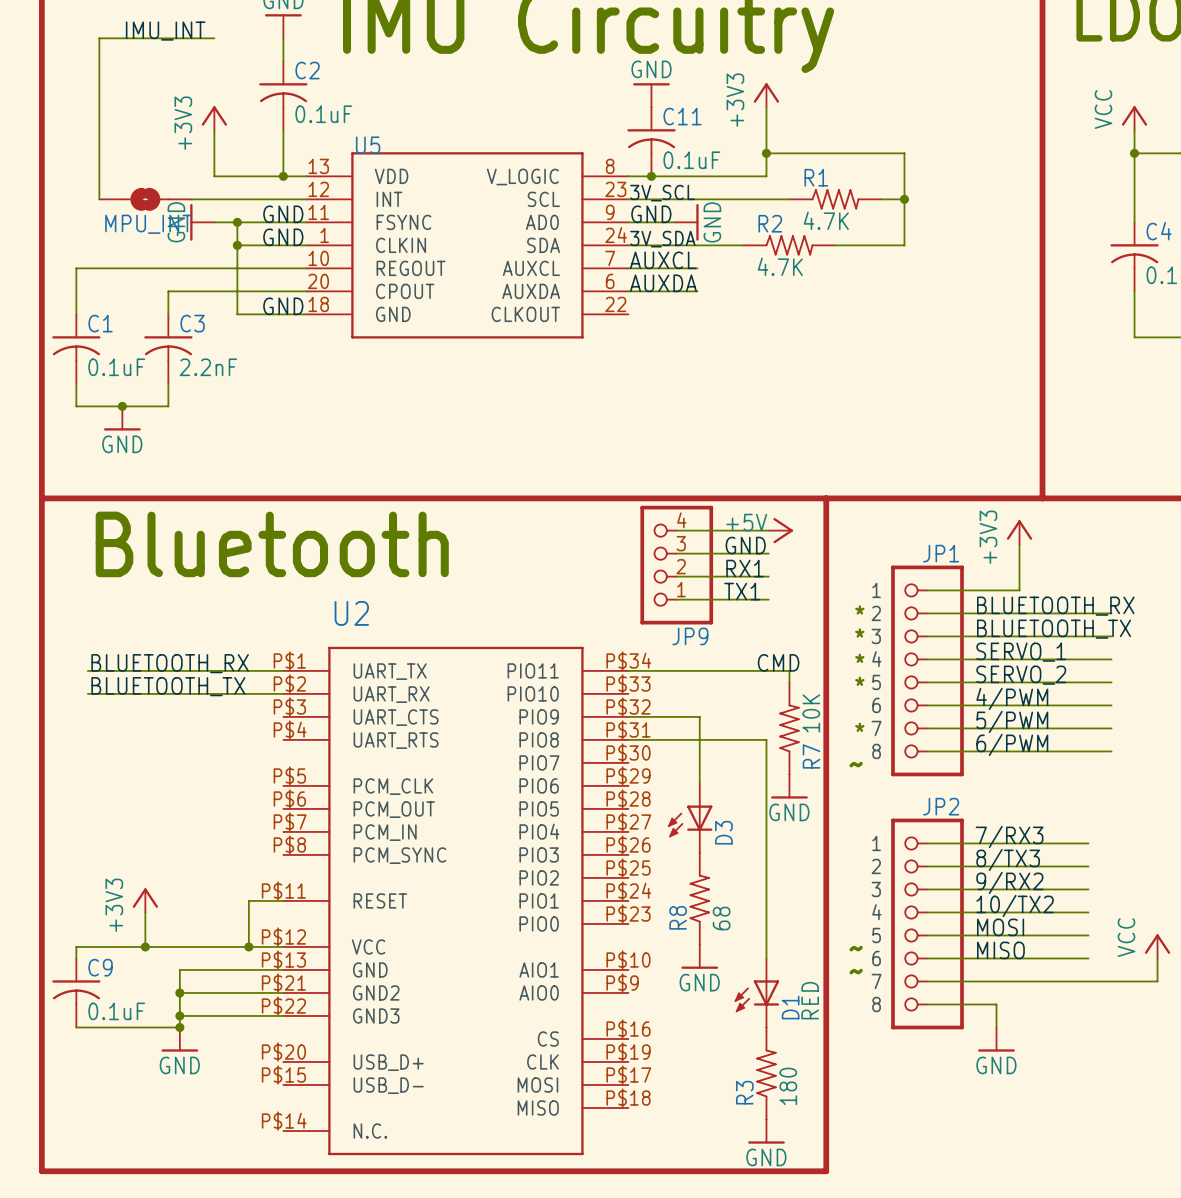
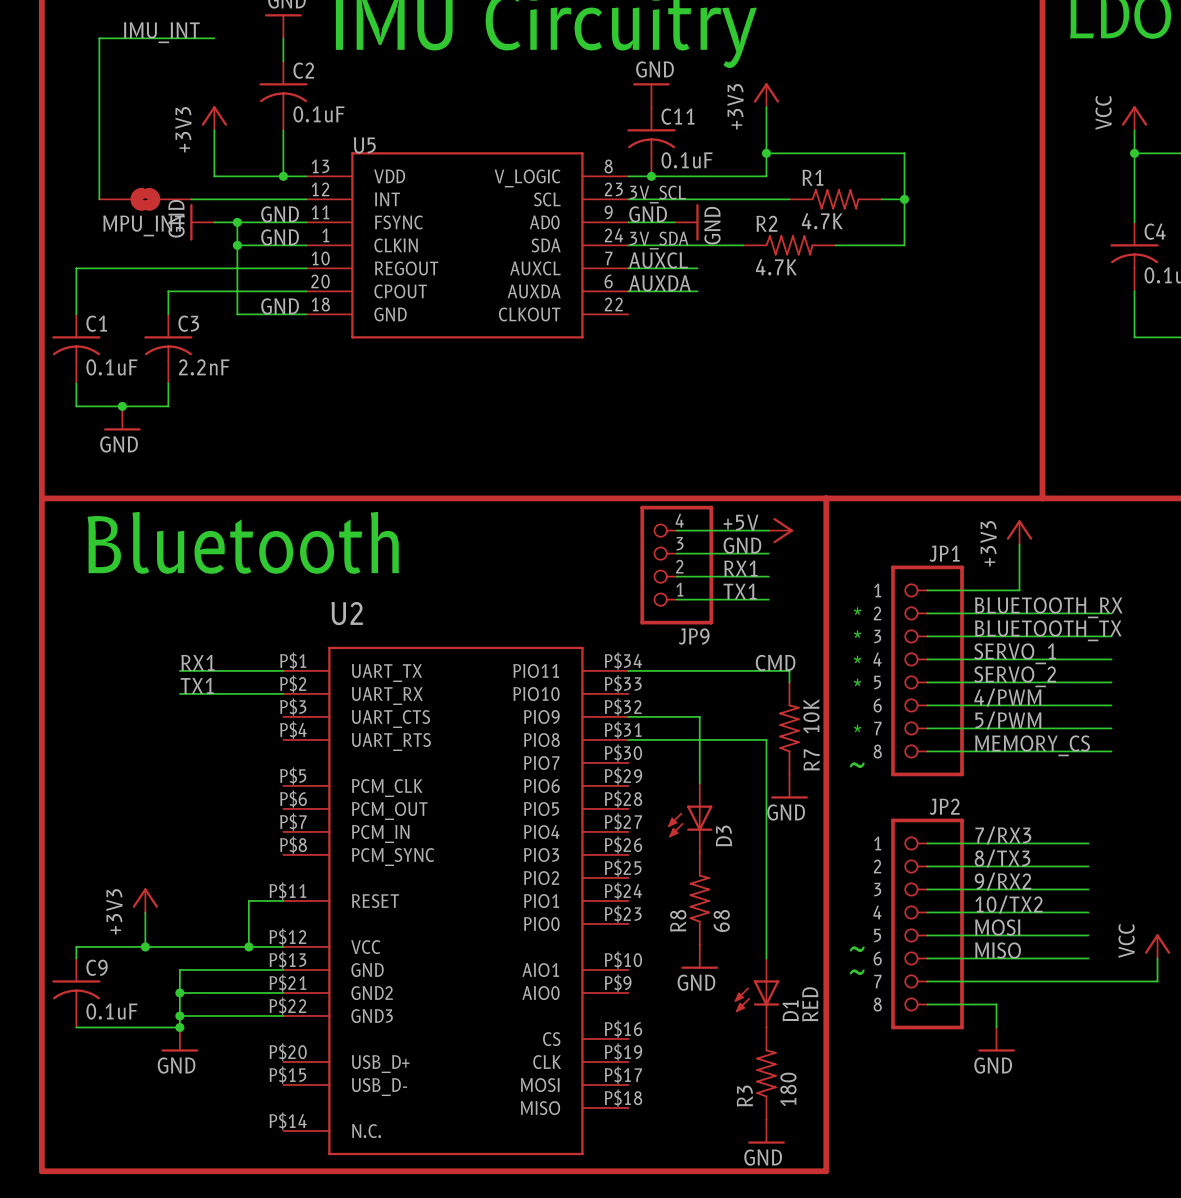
label: none -> RX1 (198, 662)
label: BLUETOOTH_RX (170, 663) -> none
wire: (87, 670) (179, 670) -> none
label: none -> TX1 (197, 685)
label: BLUETOOTH_TX (168, 686) -> none
wire: (87, 693) (179, 693) -> none
label: 6/PWM (1012, 744) -> MEMORY_CS (1032, 745)

